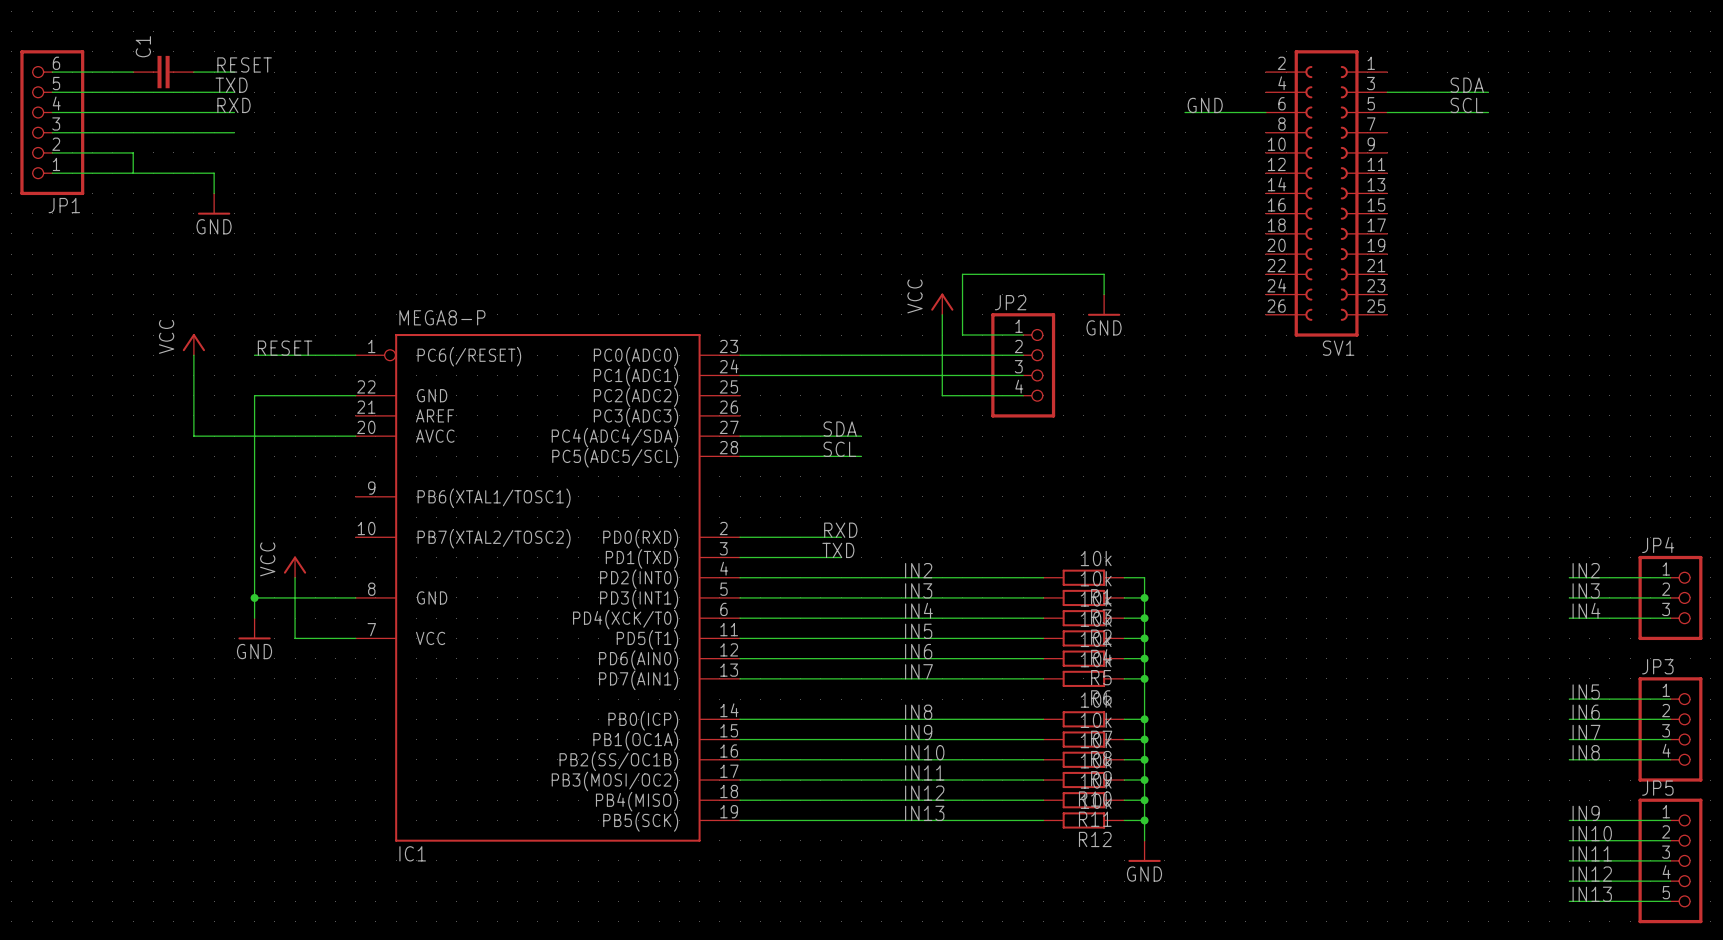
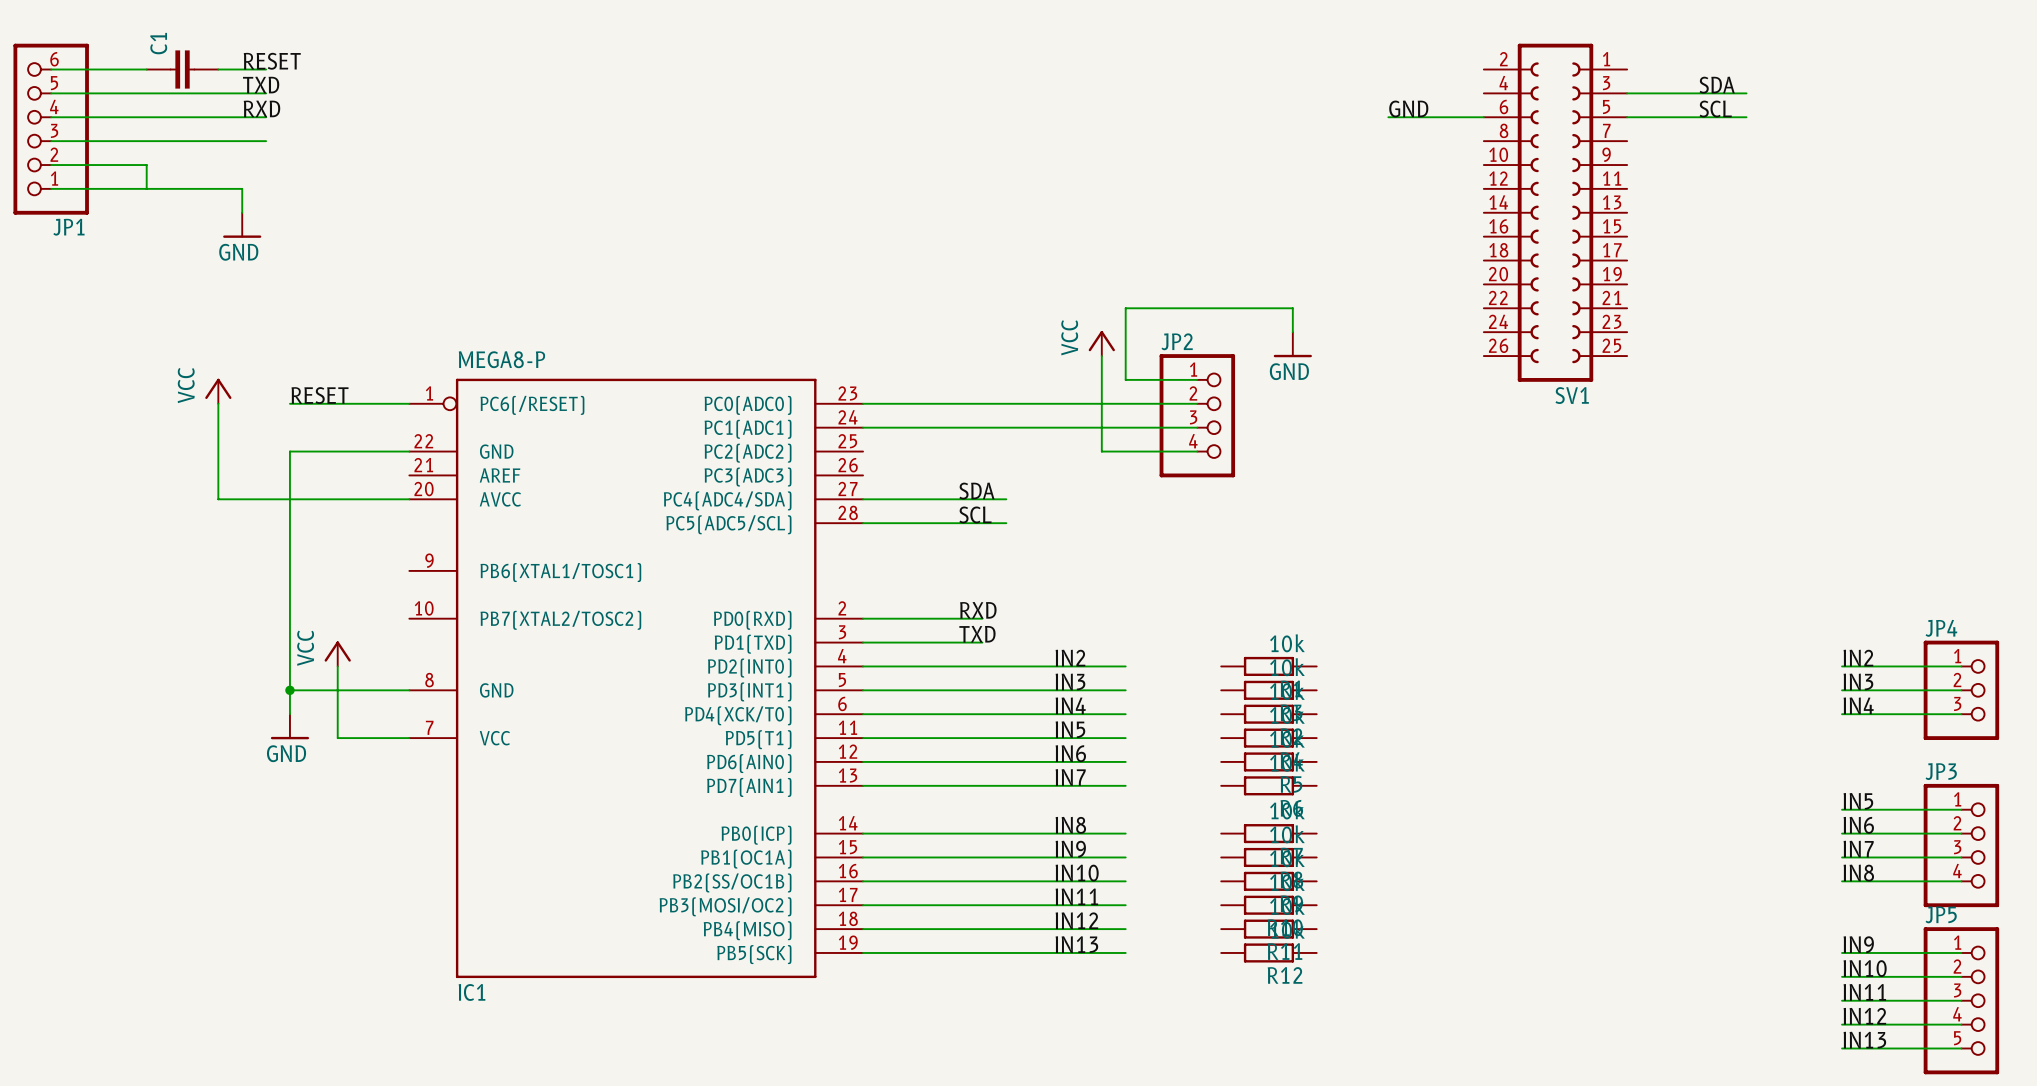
wire: (962, 577) (1043, 577) -> none
wire: (1124, 577) (1144, 577) (1144, 840) -> none
wire: (962, 597) (1043, 597) -> none
wire: (1124, 597) (1144, 597) -> none
junction: (1144, 597) -> none
wire: (962, 618) (1043, 618) -> none
wire: (1124, 618) (1144, 618) -> none
junction: (1144, 618) -> none
wire: (962, 638) (1043, 638) -> none
wire: (1124, 638) (1144, 638) -> none
junction: (1144, 638) -> none
wire: (962, 658) (1043, 658) -> none
wire: (1124, 658) (1144, 658) -> none
junction: (1144, 658) -> none
wire: (962, 678) (1043, 678) -> none
wire: (1124, 678) (1144, 678) -> none
junction: (1144, 678) -> none
wire: (962, 719) (1043, 719) -> none
wire: (1124, 719) (1144, 719) -> none
junction: (1144, 719) -> none
wire: (962, 739) (1043, 739) -> none
wire: (1124, 739) (1144, 739) -> none
junction: (1144, 739) -> none
wire: (962, 759) (1043, 759) -> none
wire: (1124, 759) (1144, 759) -> none
junction: (1144, 759) -> none
wire: (962, 780) (1043, 780) -> none
wire: (1124, 780) (1144, 780) -> none
junction: (1144, 780) -> none
wire: (962, 800) (1043, 800) -> none
wire: (1124, 800) (1144, 800) -> none
junction: (1144, 800) -> none
wire: (962, 820) (1043, 820) -> none
wire: (1124, 820) (1144, 820) -> none
junction: (1144, 820) -> none
power symbol: GND (1144, 851) -> none

